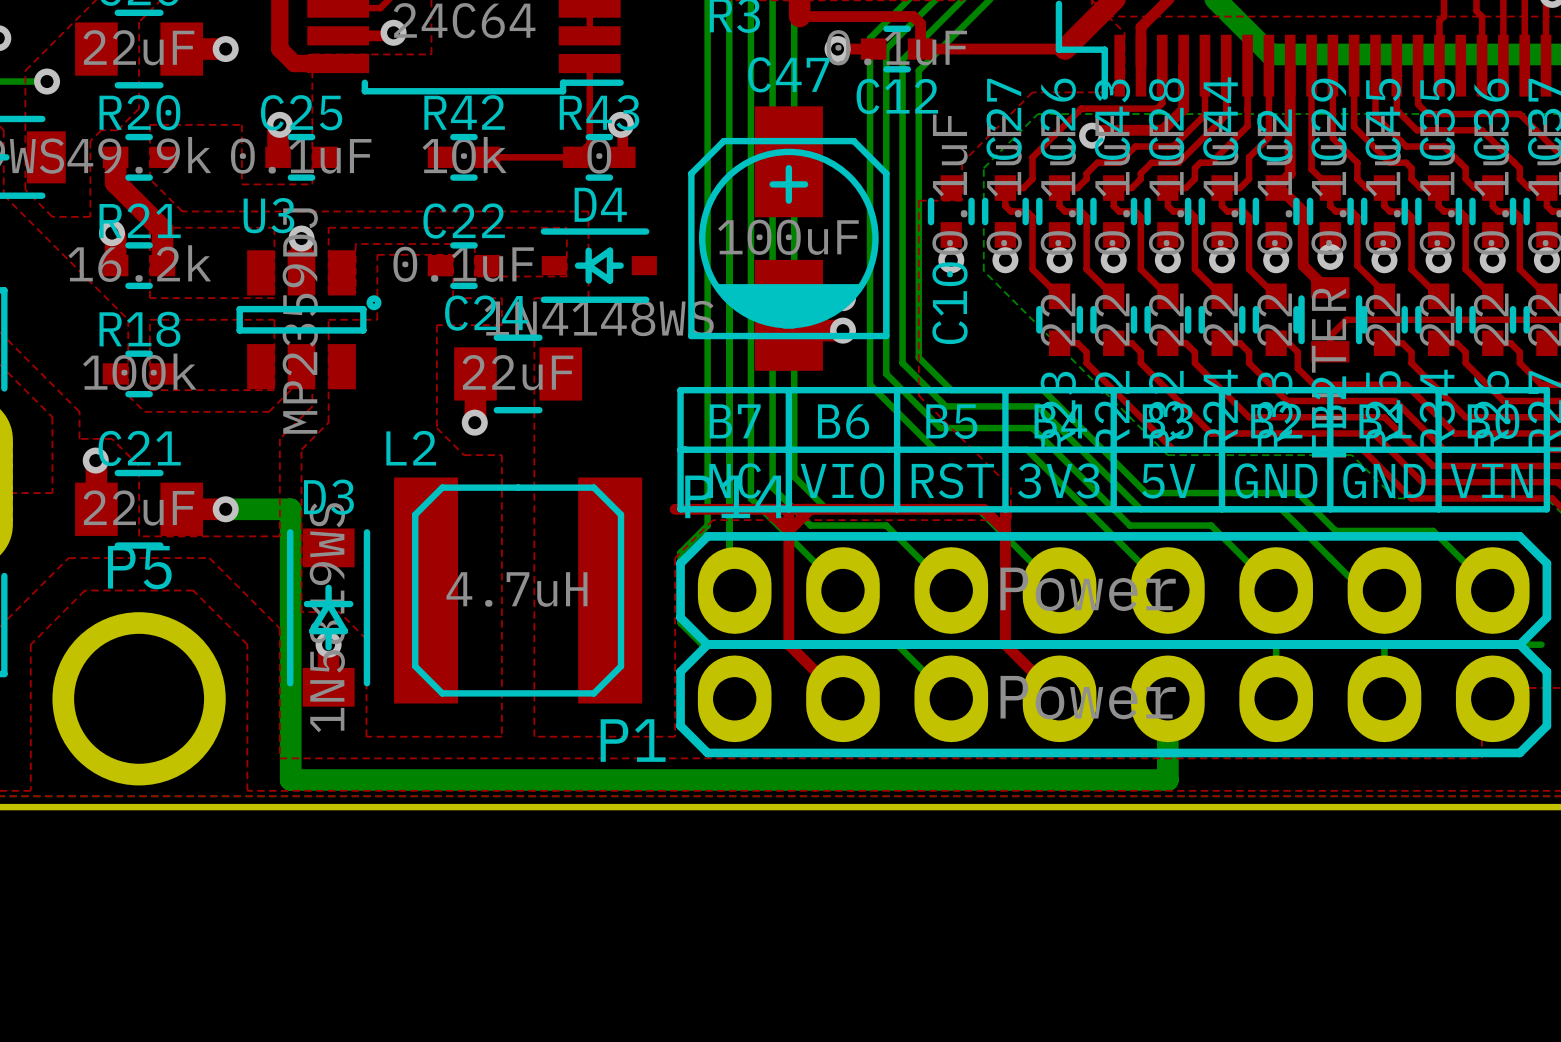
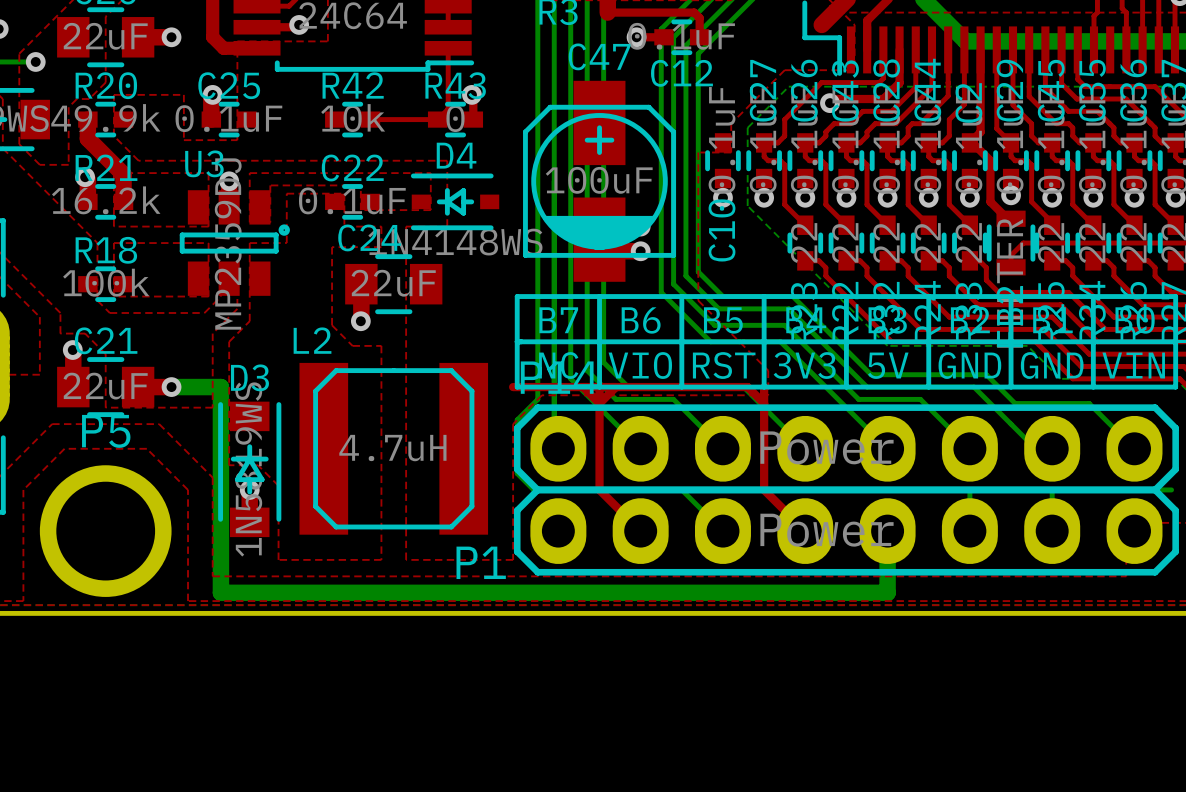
top track: (1081, 32) (1064, 49) (920, 49) -> none

